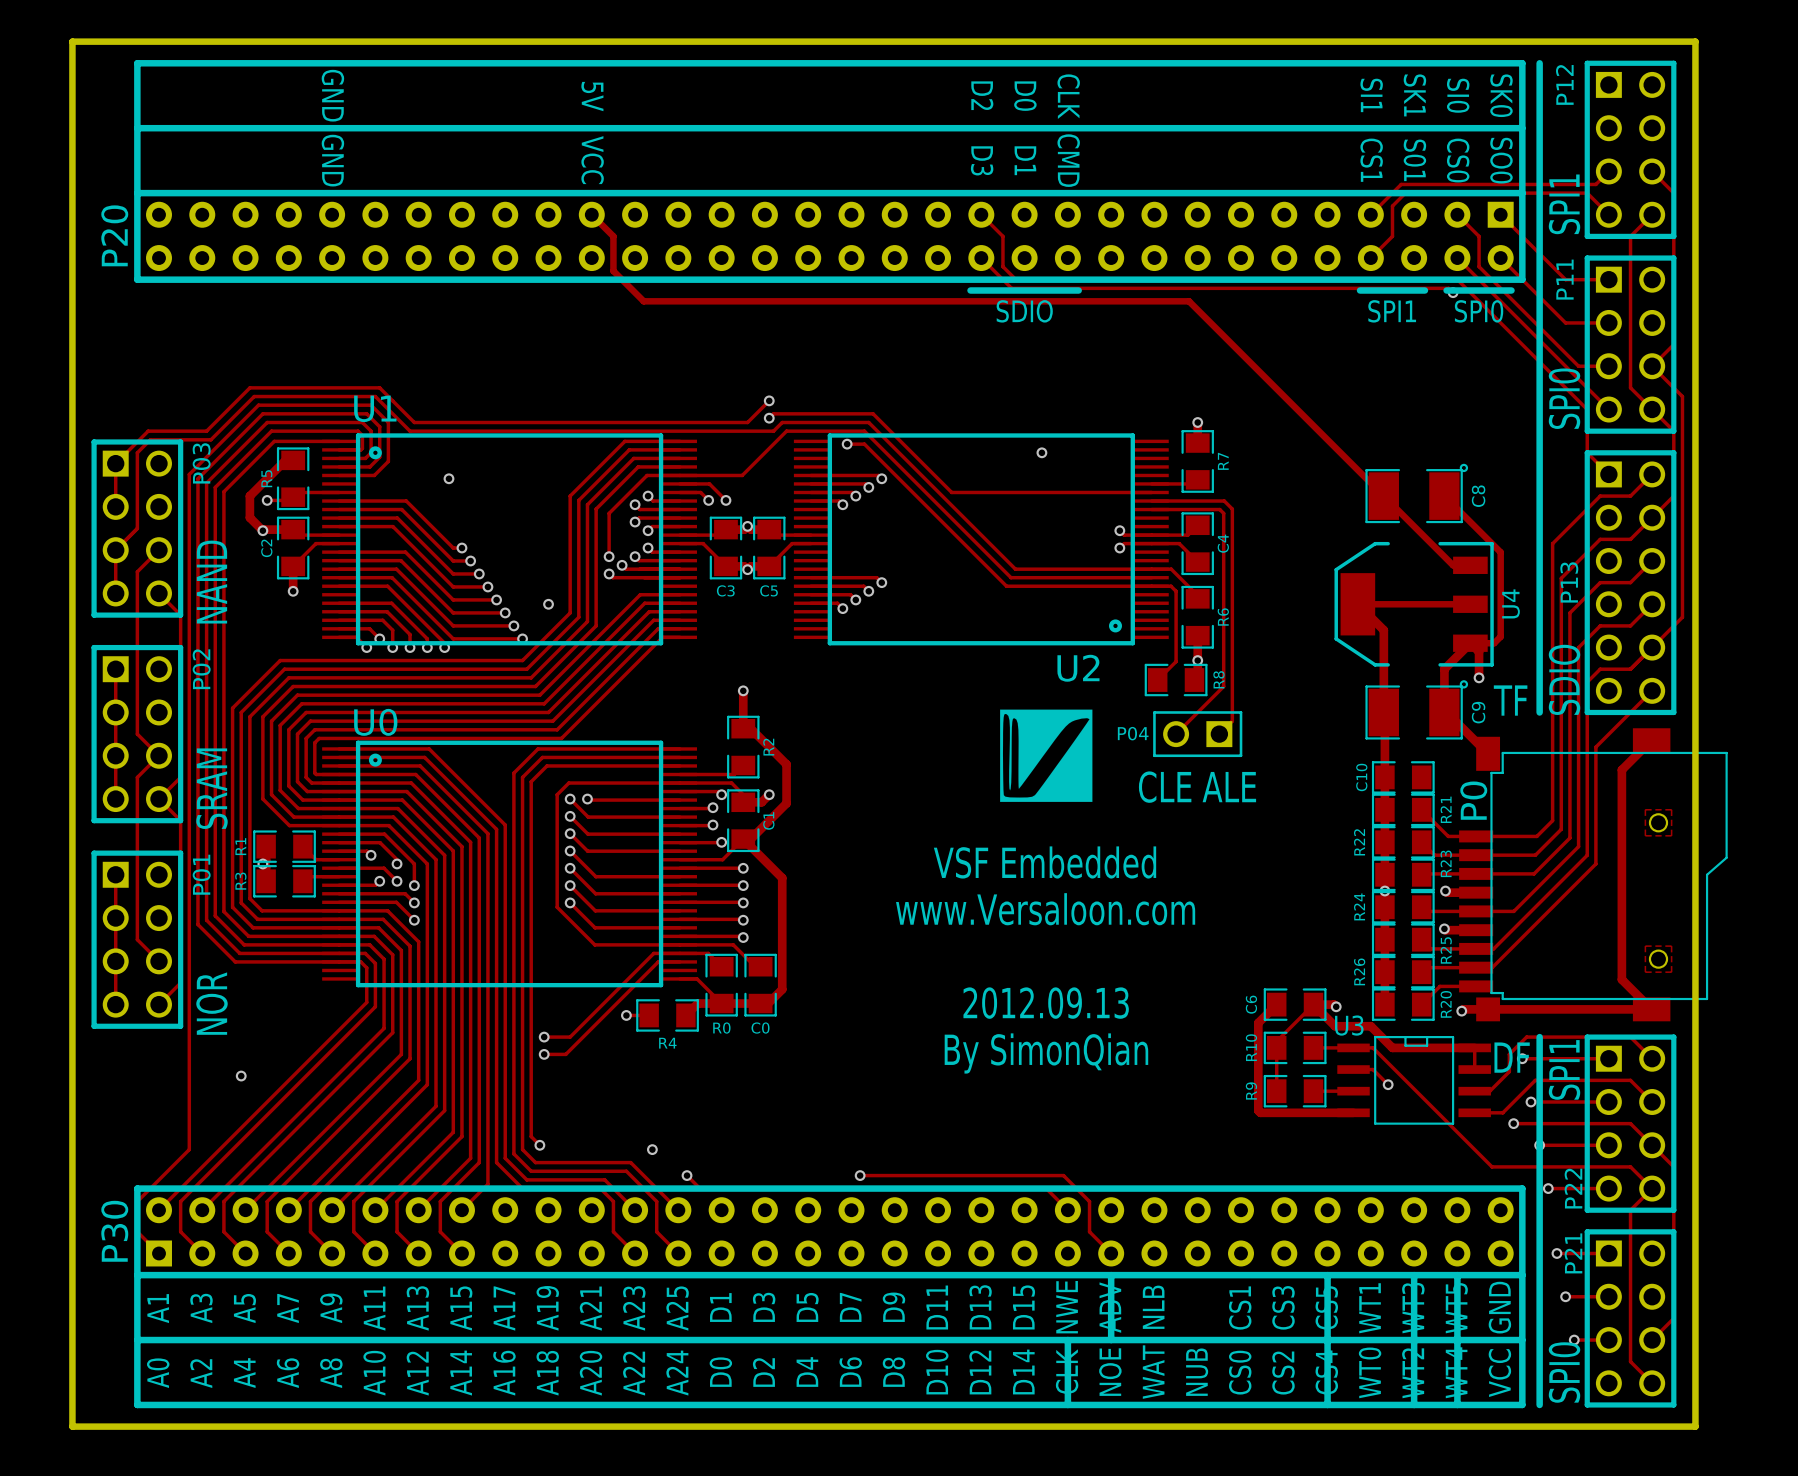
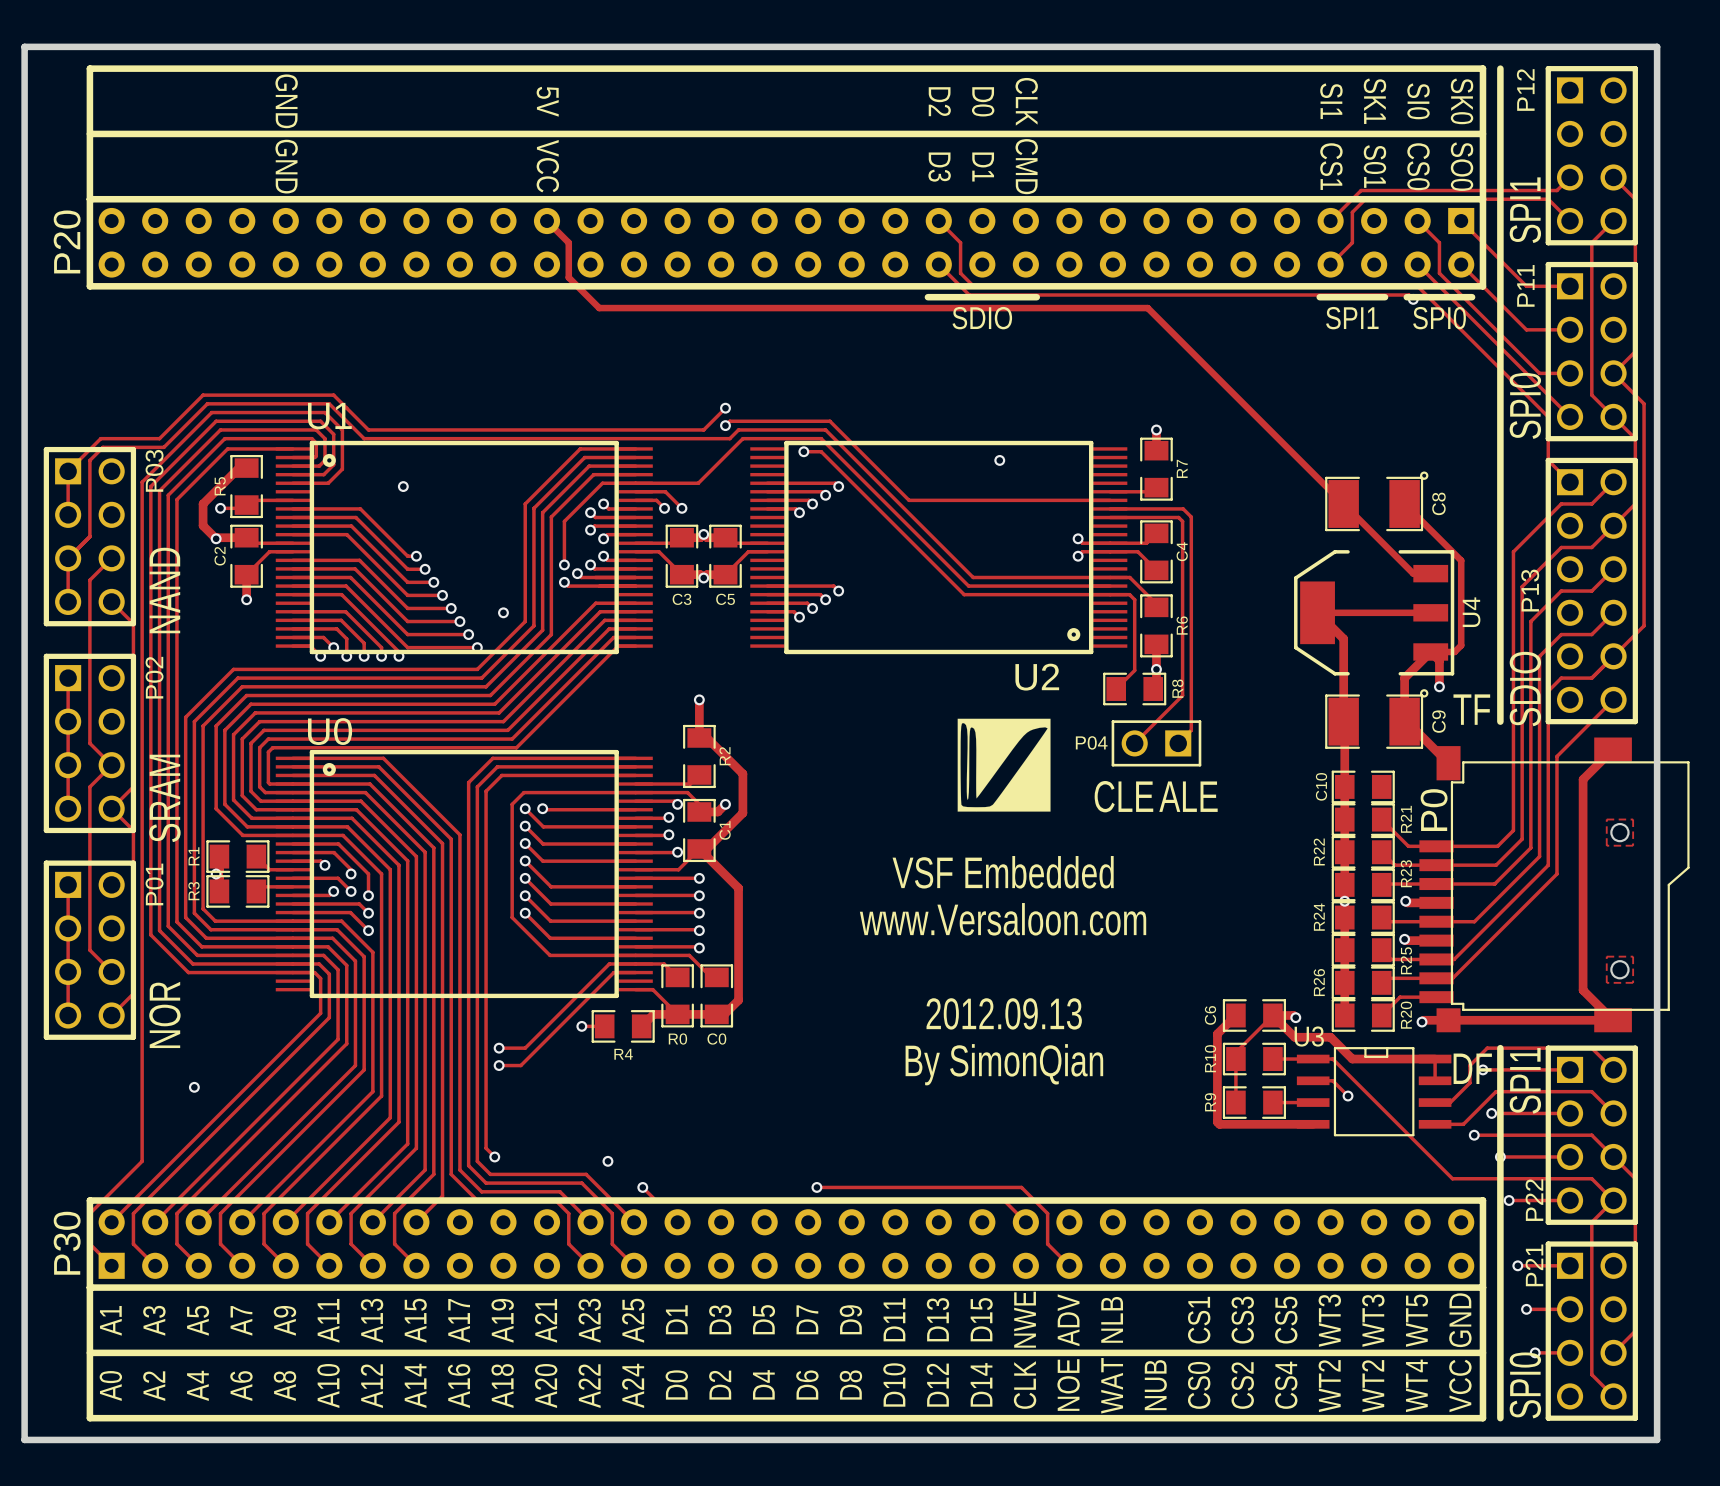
line: (1111, 1275) (1111, 1340) -> none
line: (1327, 1275) (1327, 1404) -> none
line: (1414, 1275) (1414, 1404) -> none
line: (1457, 1275) (1457, 1404) -> none
text: WT1 (1370, 1308) -> WT3 (1329, 1320)
line: (1067, 1340) (1067, 1404) -> none
text: WT0 (1370, 1372) -> WT2 (1329, 1386)

